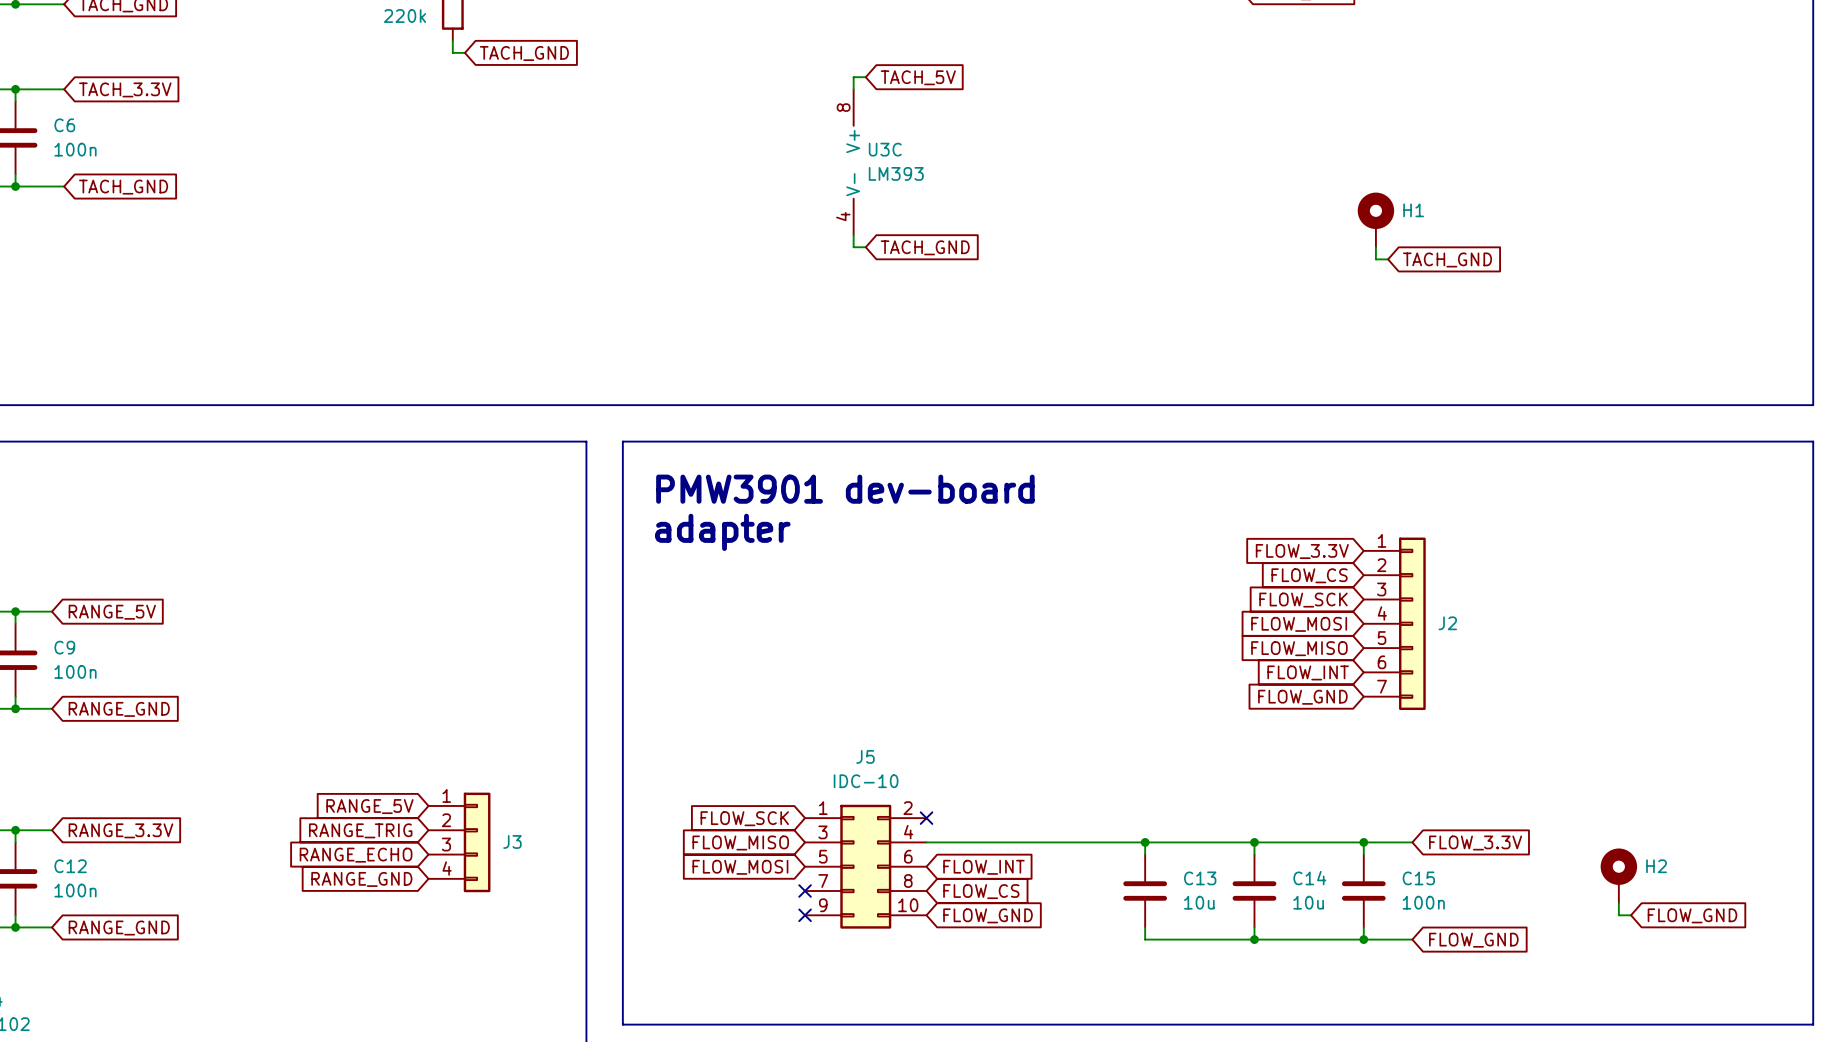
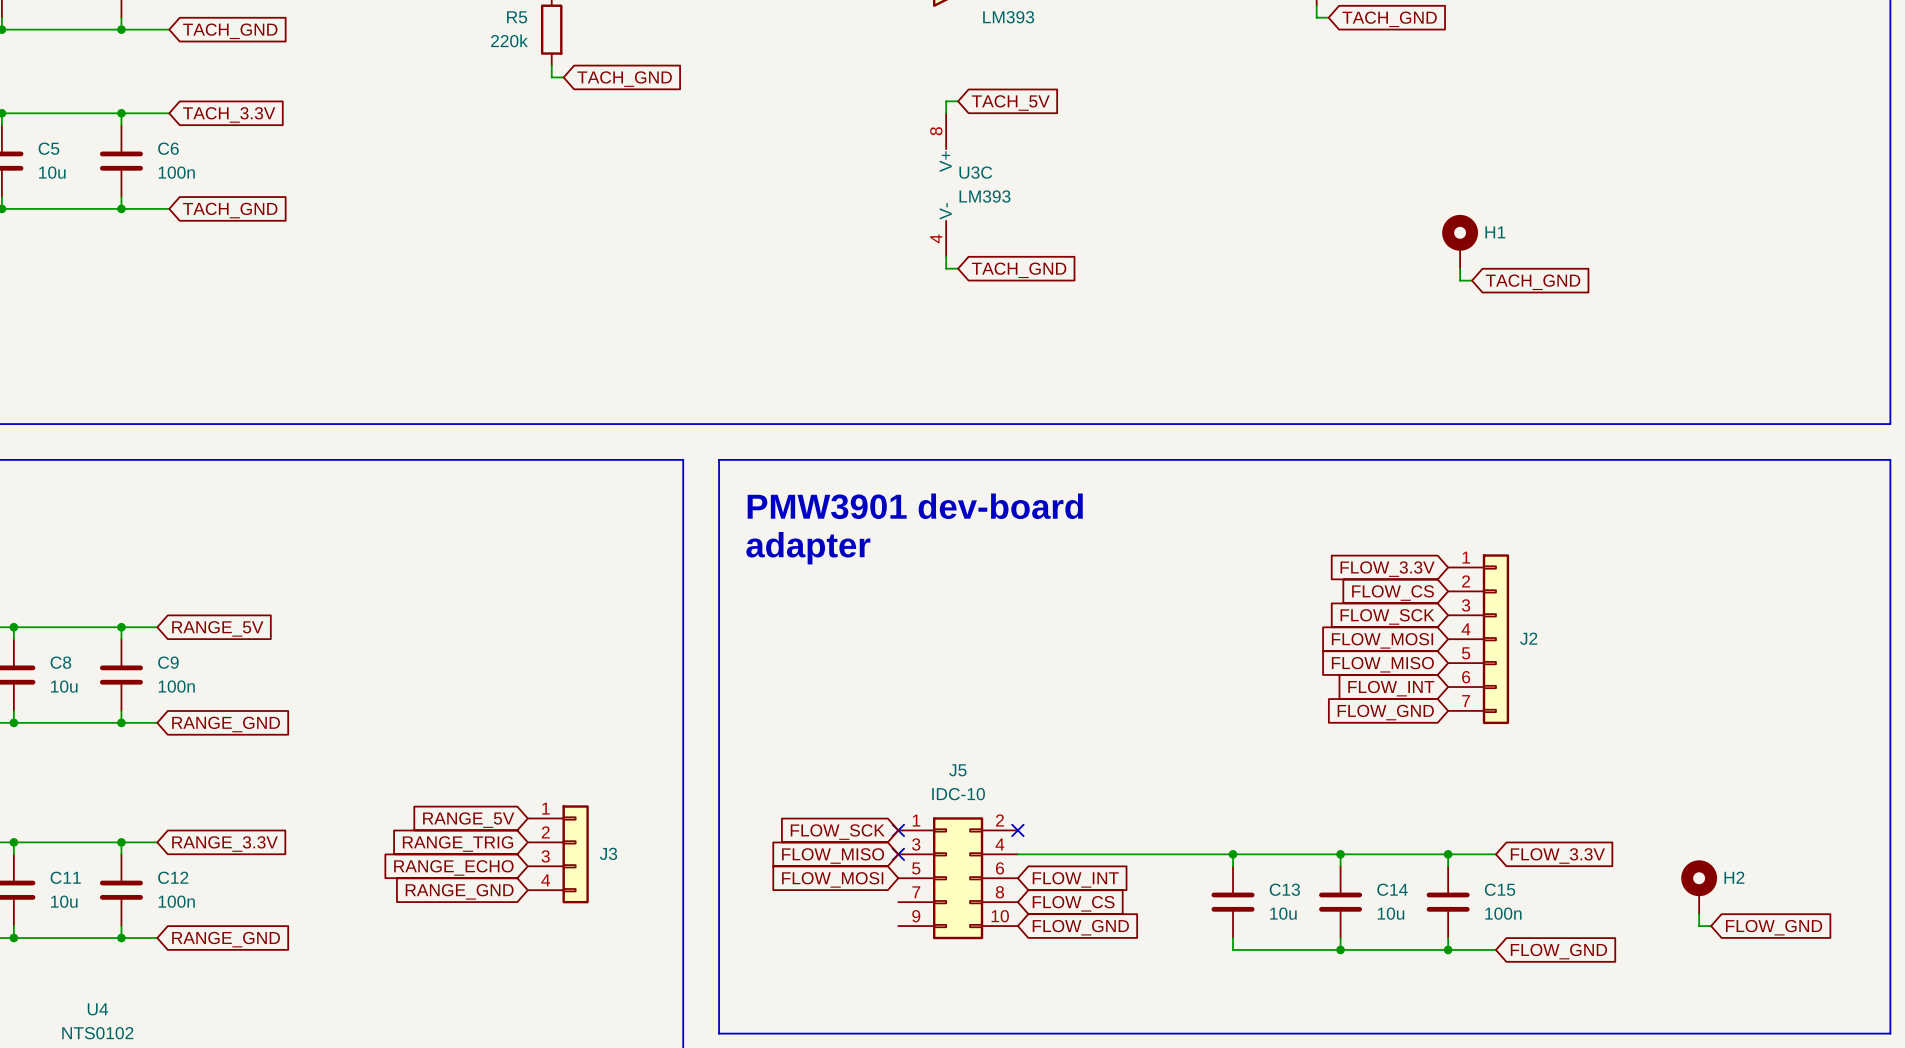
no-connect mark: none -> (898, 830)
no-connect mark: none -> (898, 854)
no-connect mark: (805, 891) -> none
no-connect mark: (805, 915) -> none

